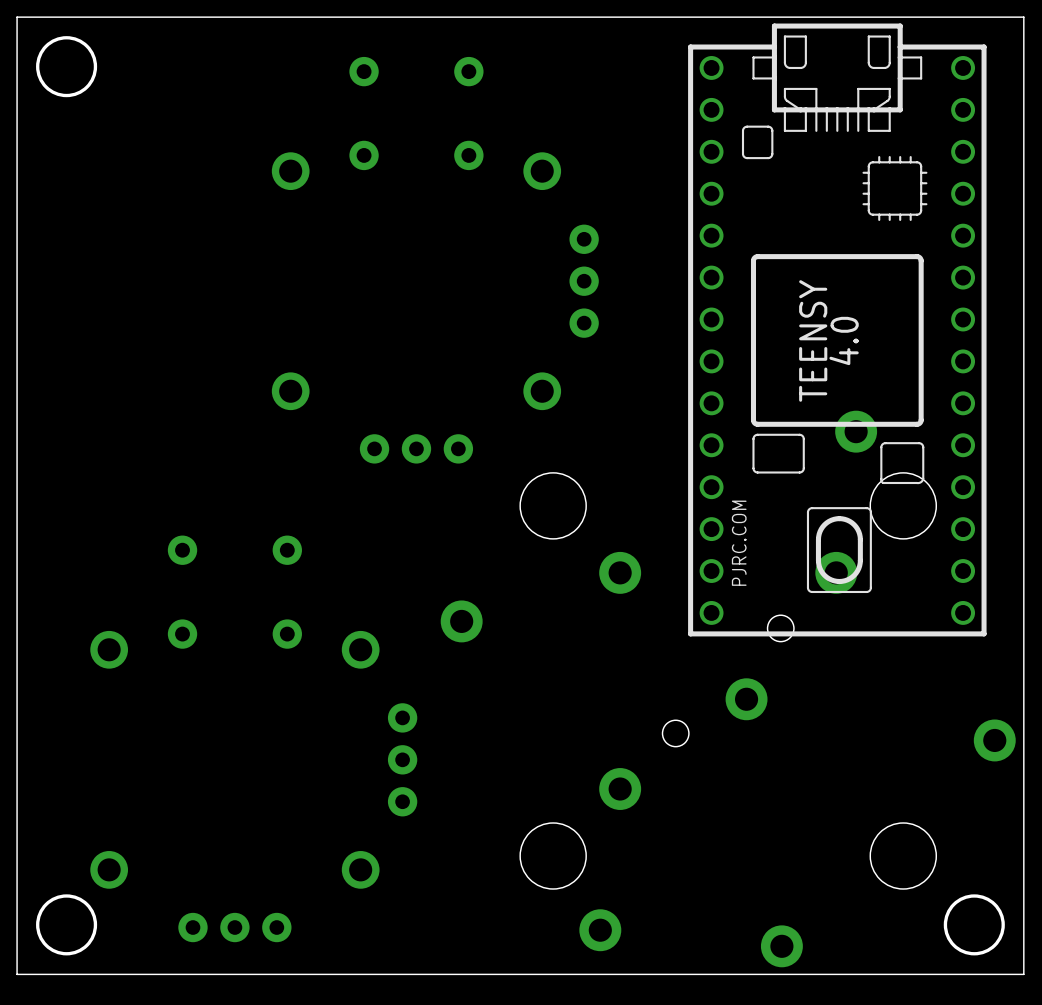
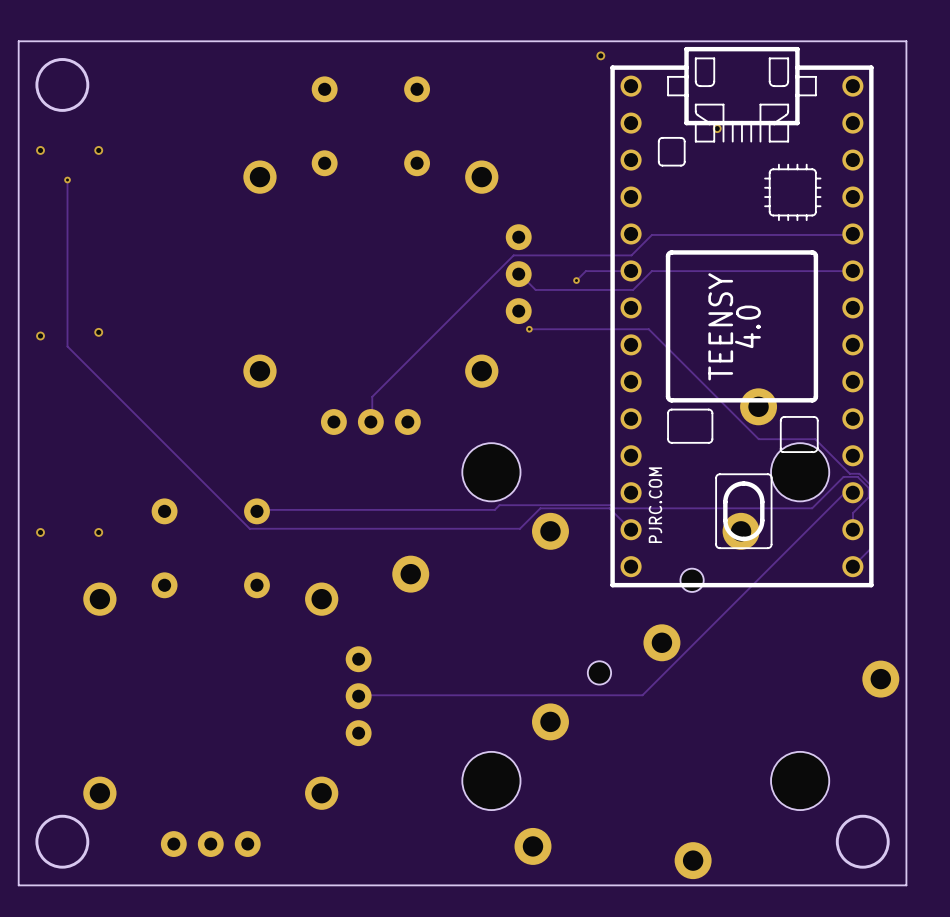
via: none -> (600, 55)
via: none -> (717, 128)
via: none -> (40, 150)
via: none -> (98, 150)
track: none -> (67, 179) (67, 346) (249, 528) (519, 528) (540, 508) (609, 508) (631, 529)
via: none -> (67, 179)
track: none -> (852, 233) (651, 234) (631, 255) (513, 255) (372, 396) (370, 422)
track: none -> (631, 270) (585, 271) (576, 280)
track: none -> (852, 270) (651, 271) (633, 289) (535, 289) (518, 274)
via: none -> (576, 280)
track: none -> (529, 329) (648, 329) (758, 439) (815, 439) (849, 473) (859, 473) (871, 486) (871, 547) (853, 566)
via: none -> (529, 329)
via: none -> (98, 332)
via: none -> (40, 336)
track: none -> (852, 492) (843, 494) (642, 695) (358, 696)
track: none -> (256, 511) (494, 509) (499, 505) (611, 505) (614, 508) (812, 508) (843, 476) (857, 476) (868, 487) (868, 497) (853, 513) (852, 529)
via: none -> (40, 532)
via: none -> (98, 532)

